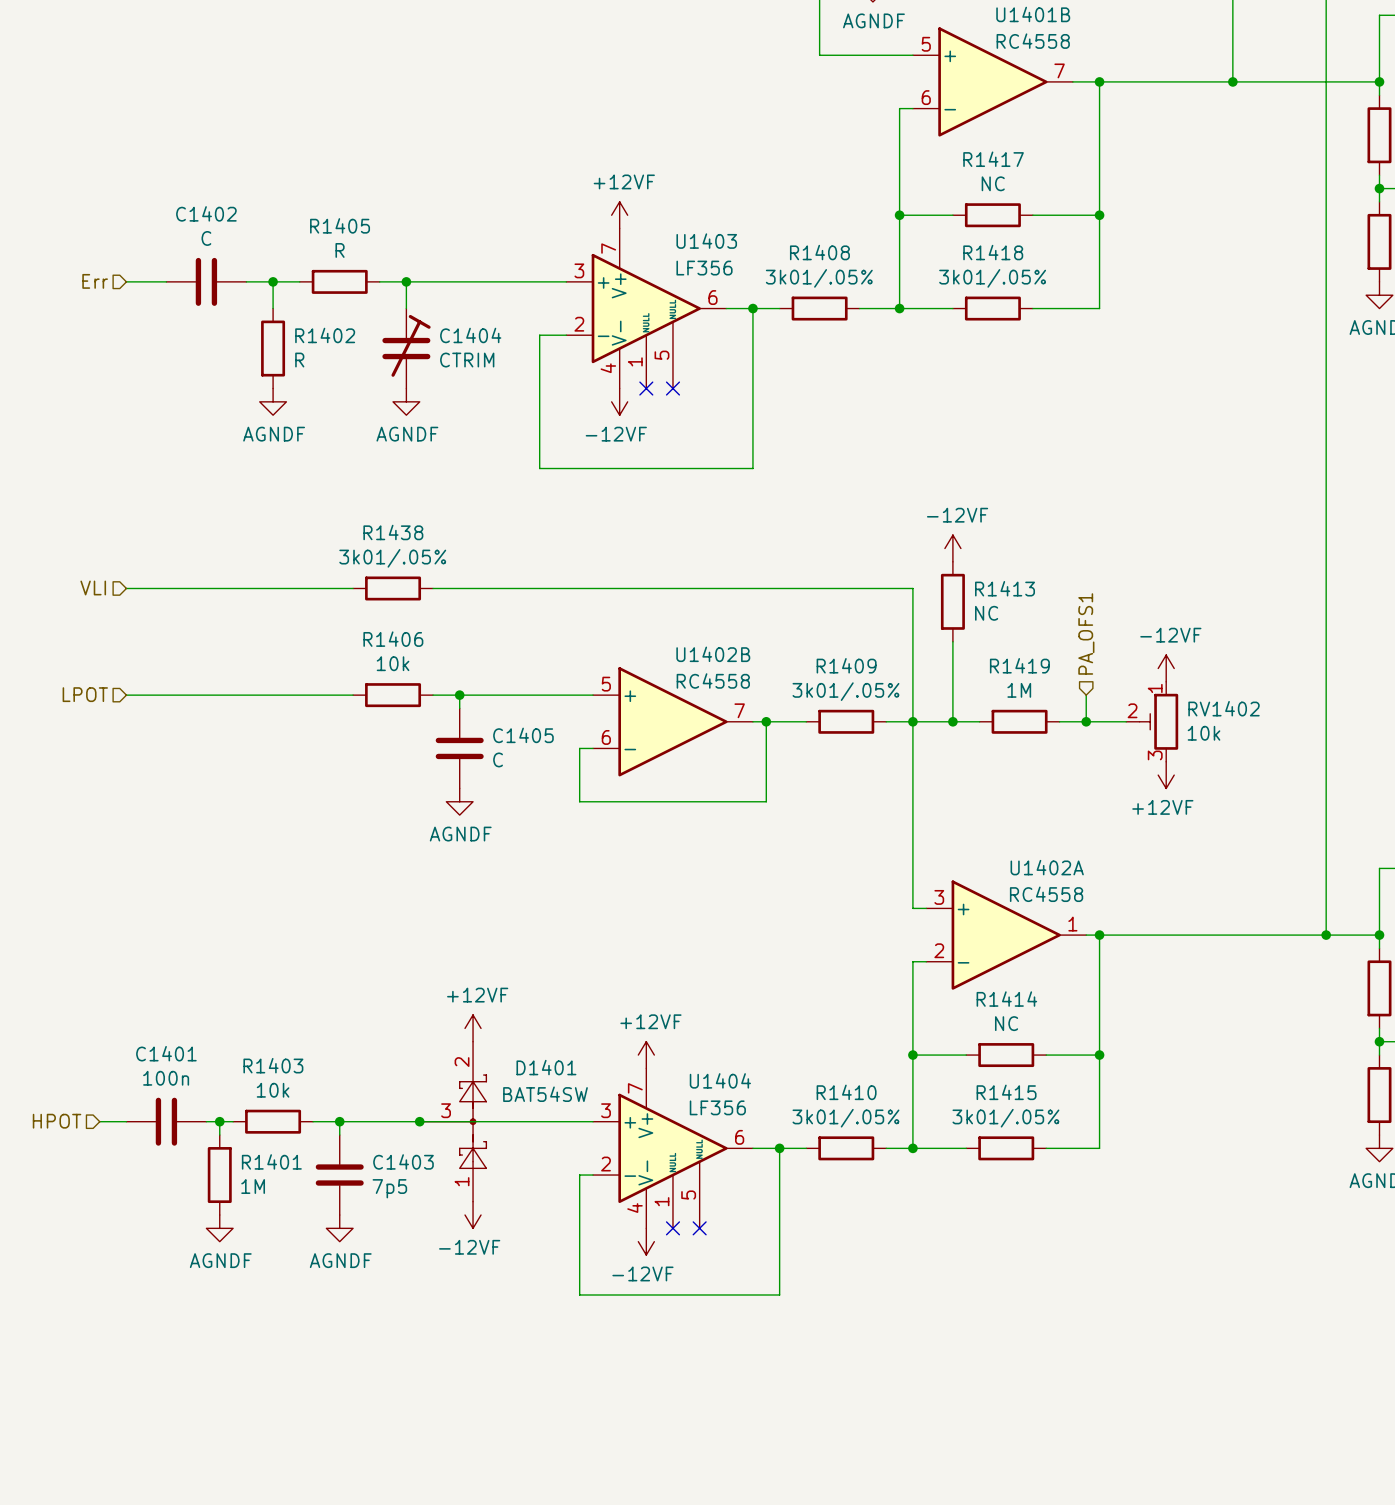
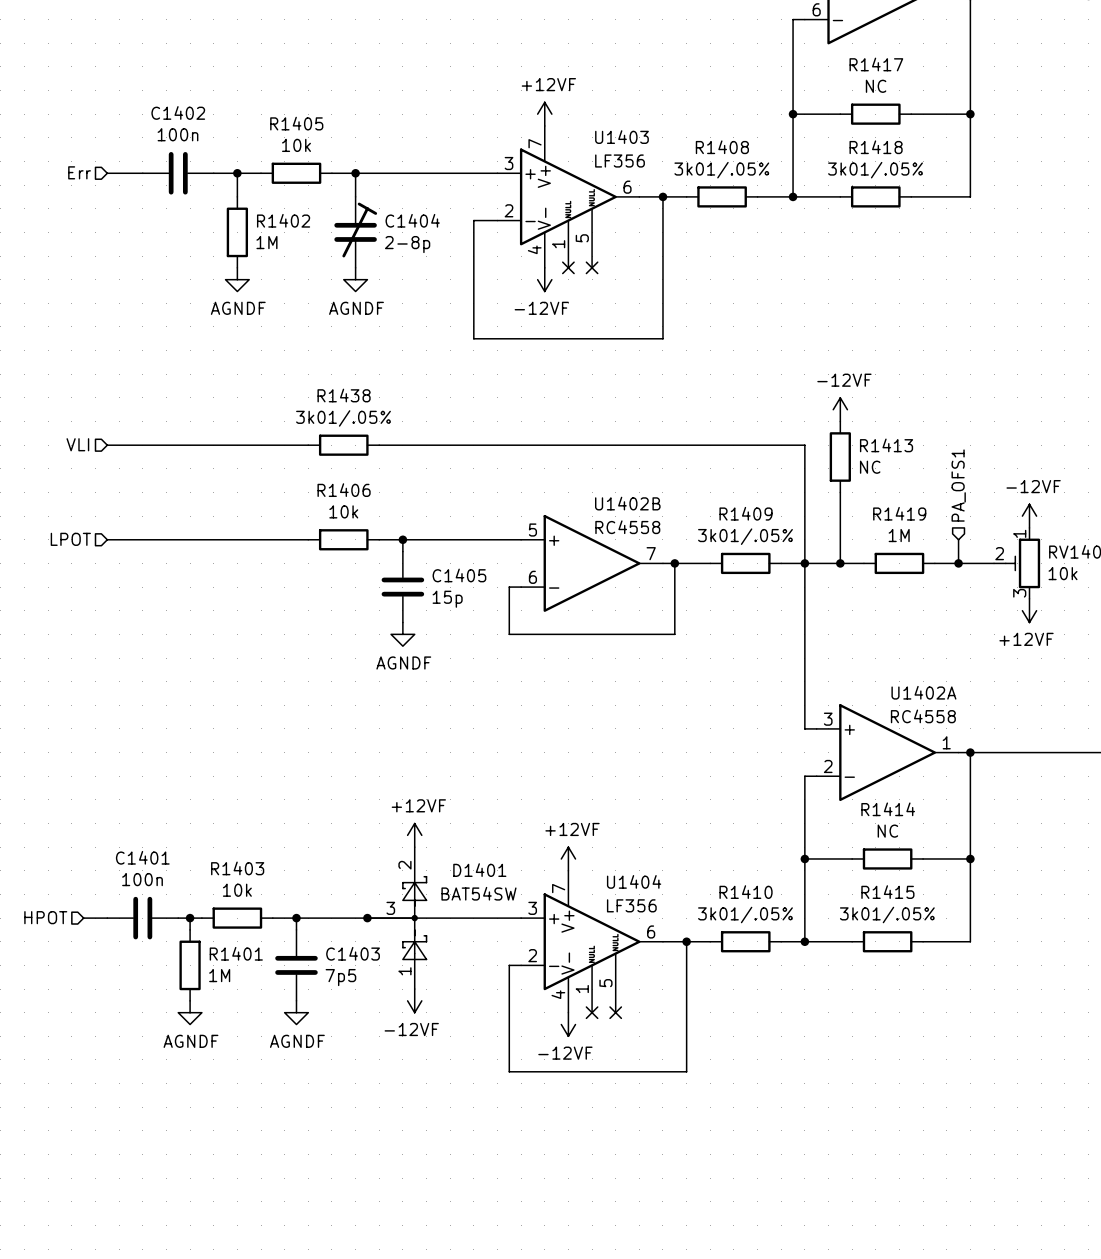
C1402 value: C (206, 238) -> 100n (177, 134)
R1405 value: R (340, 250) -> 10k (296, 145)
R1402 value: R (299, 360) -> 1M (266, 242)
C1404 value: CTRIM (467, 360) -> 2-8p (407, 244)
C1405 value: C (498, 759) -> 15p (447, 599)

